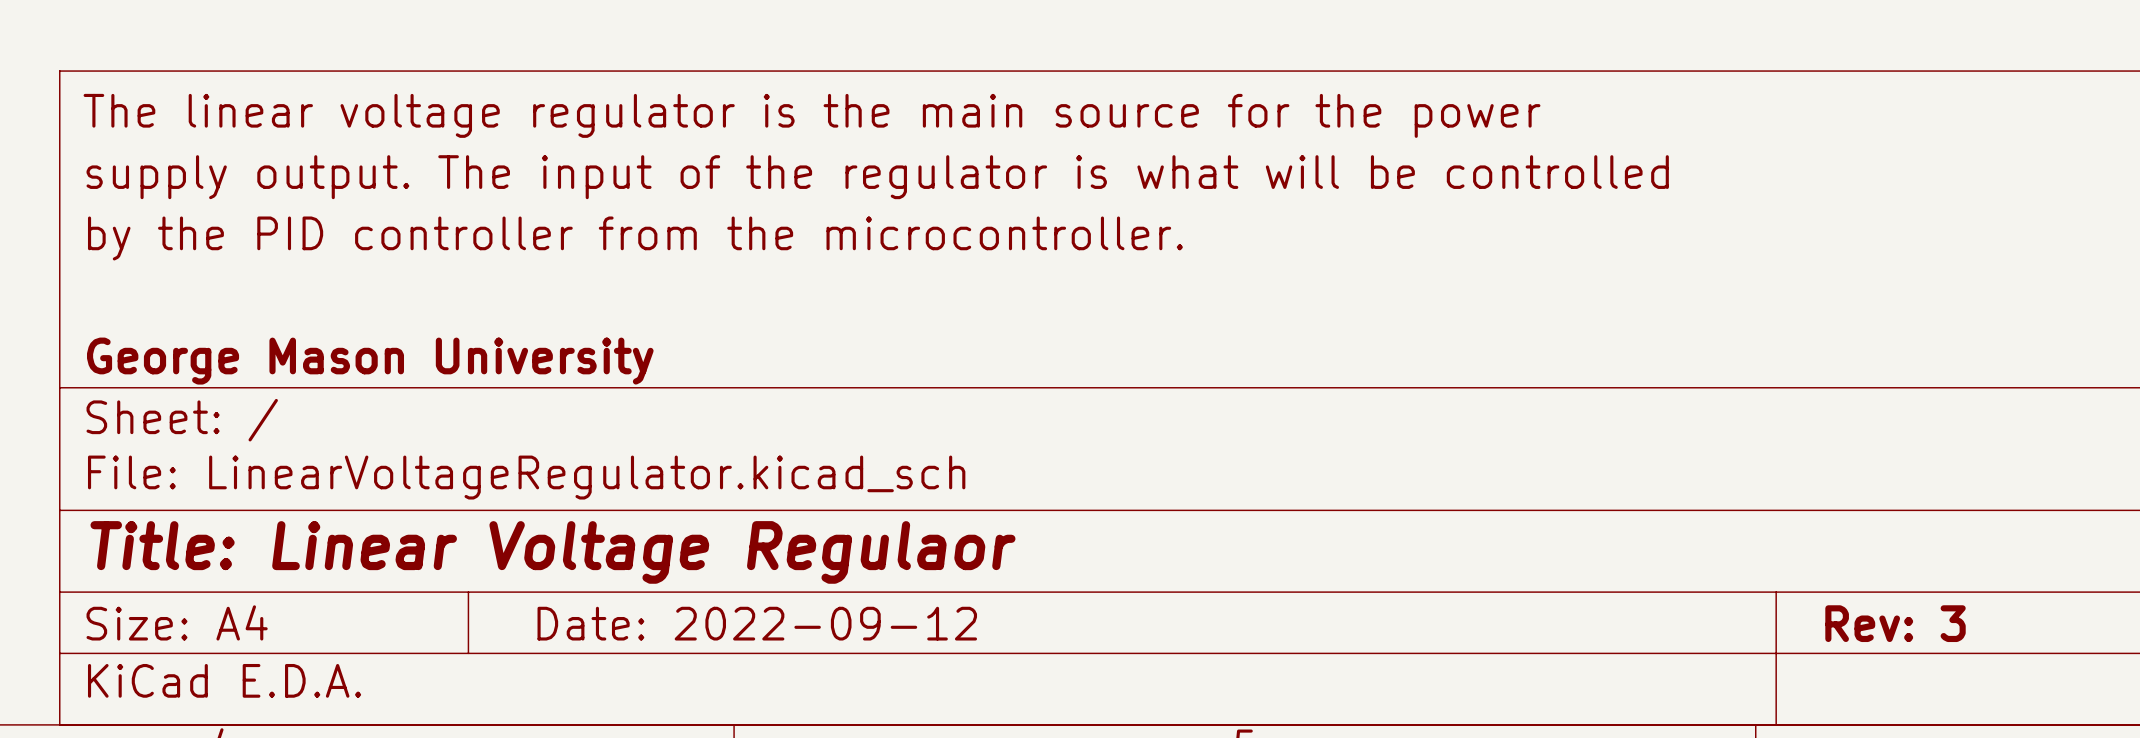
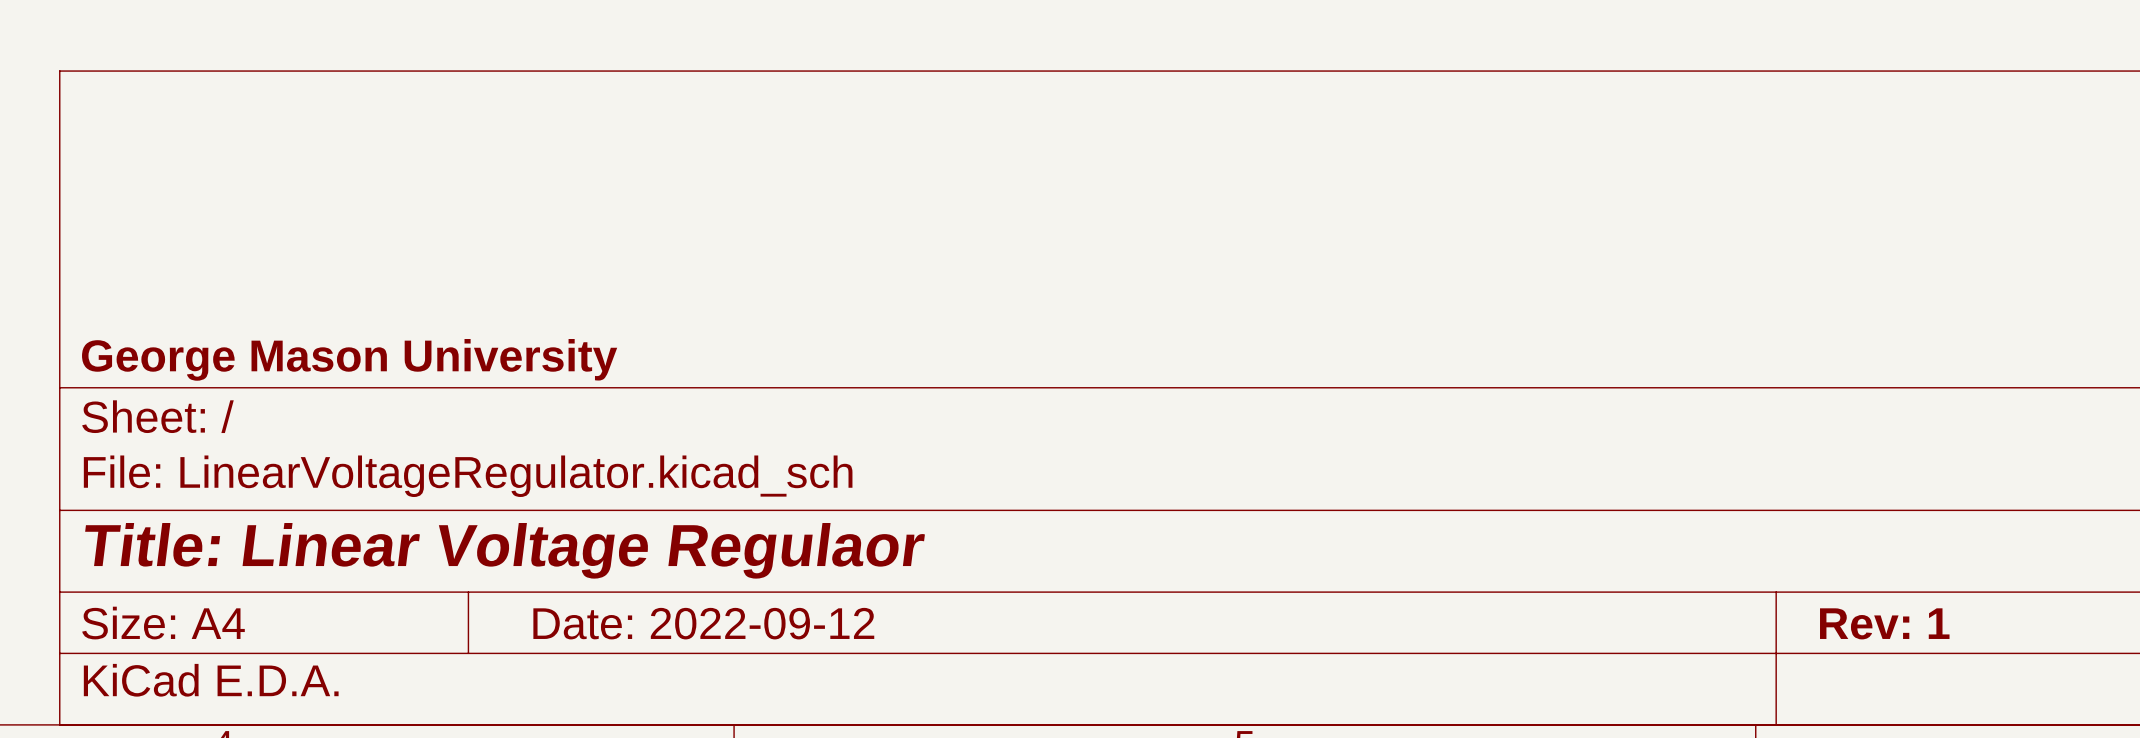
title block: The linear voltage regulator is the main source for the power (812, 115) -> none
title block: supply output. The input of the regulator is what will be controlled (877, 177) -> none
title block: by the PID controller from the microcontroller. (635, 238) -> none
title block: Rev: 3 (1895, 623) -> Rev: 1 (1884, 623)

